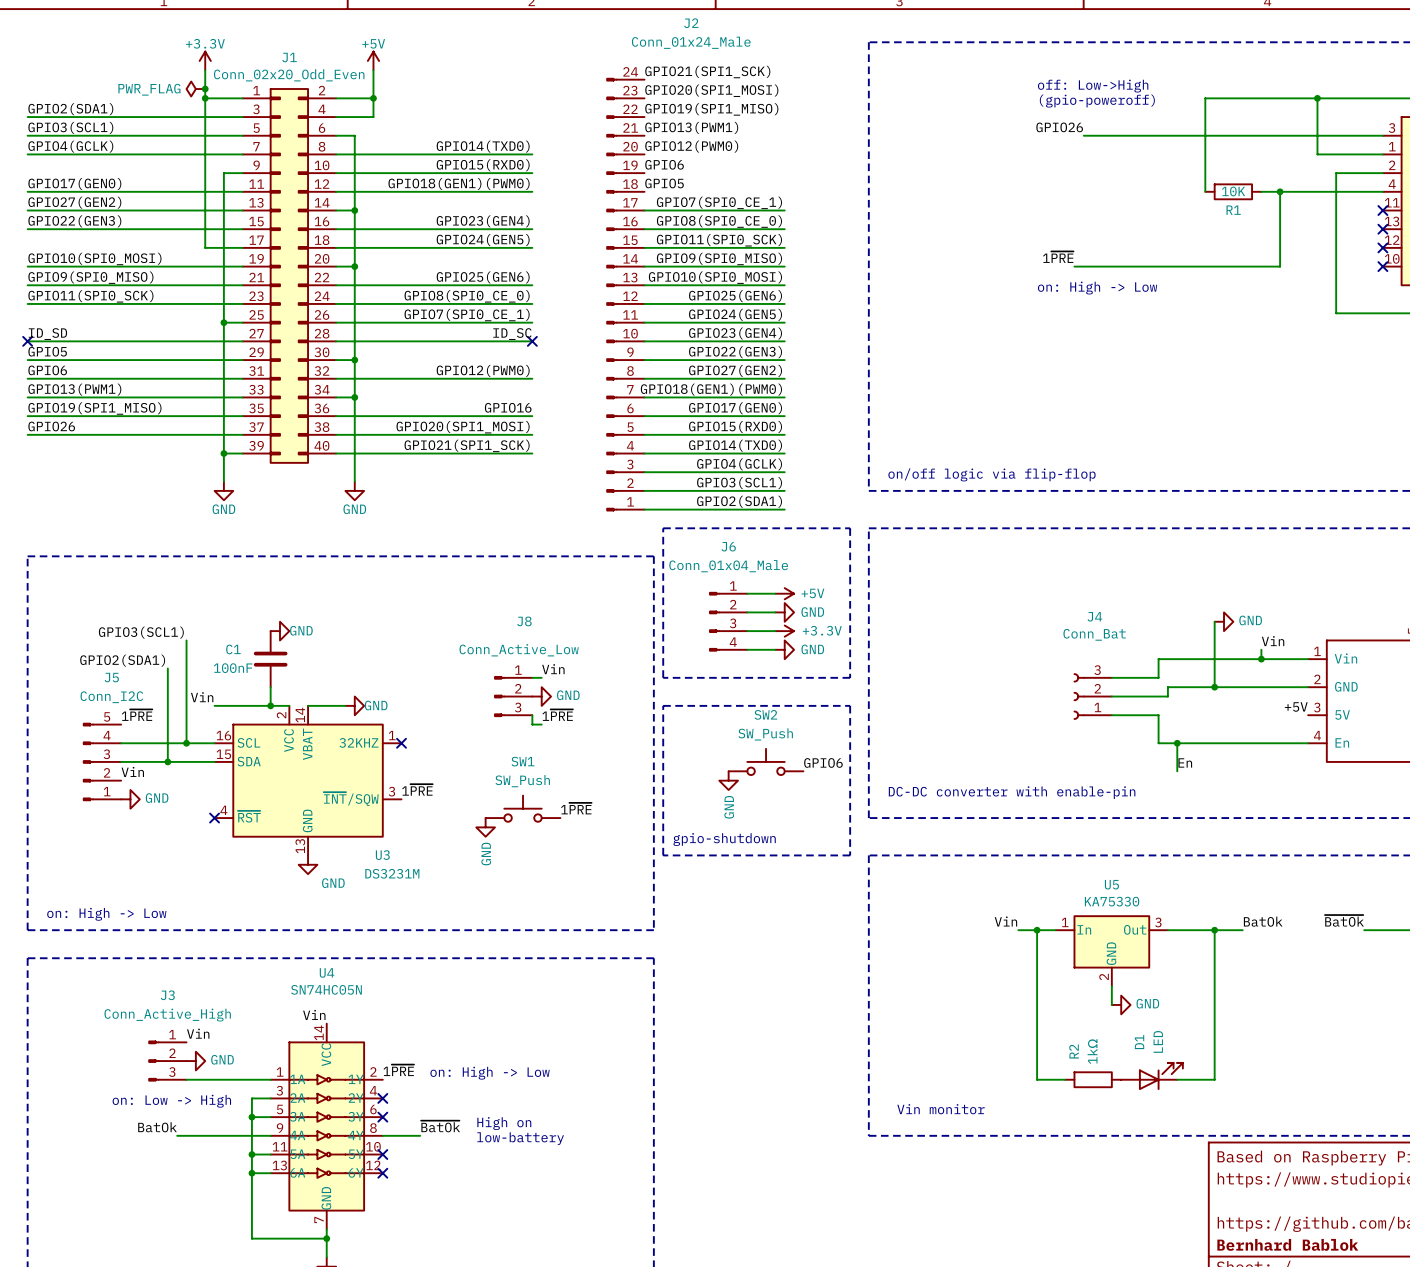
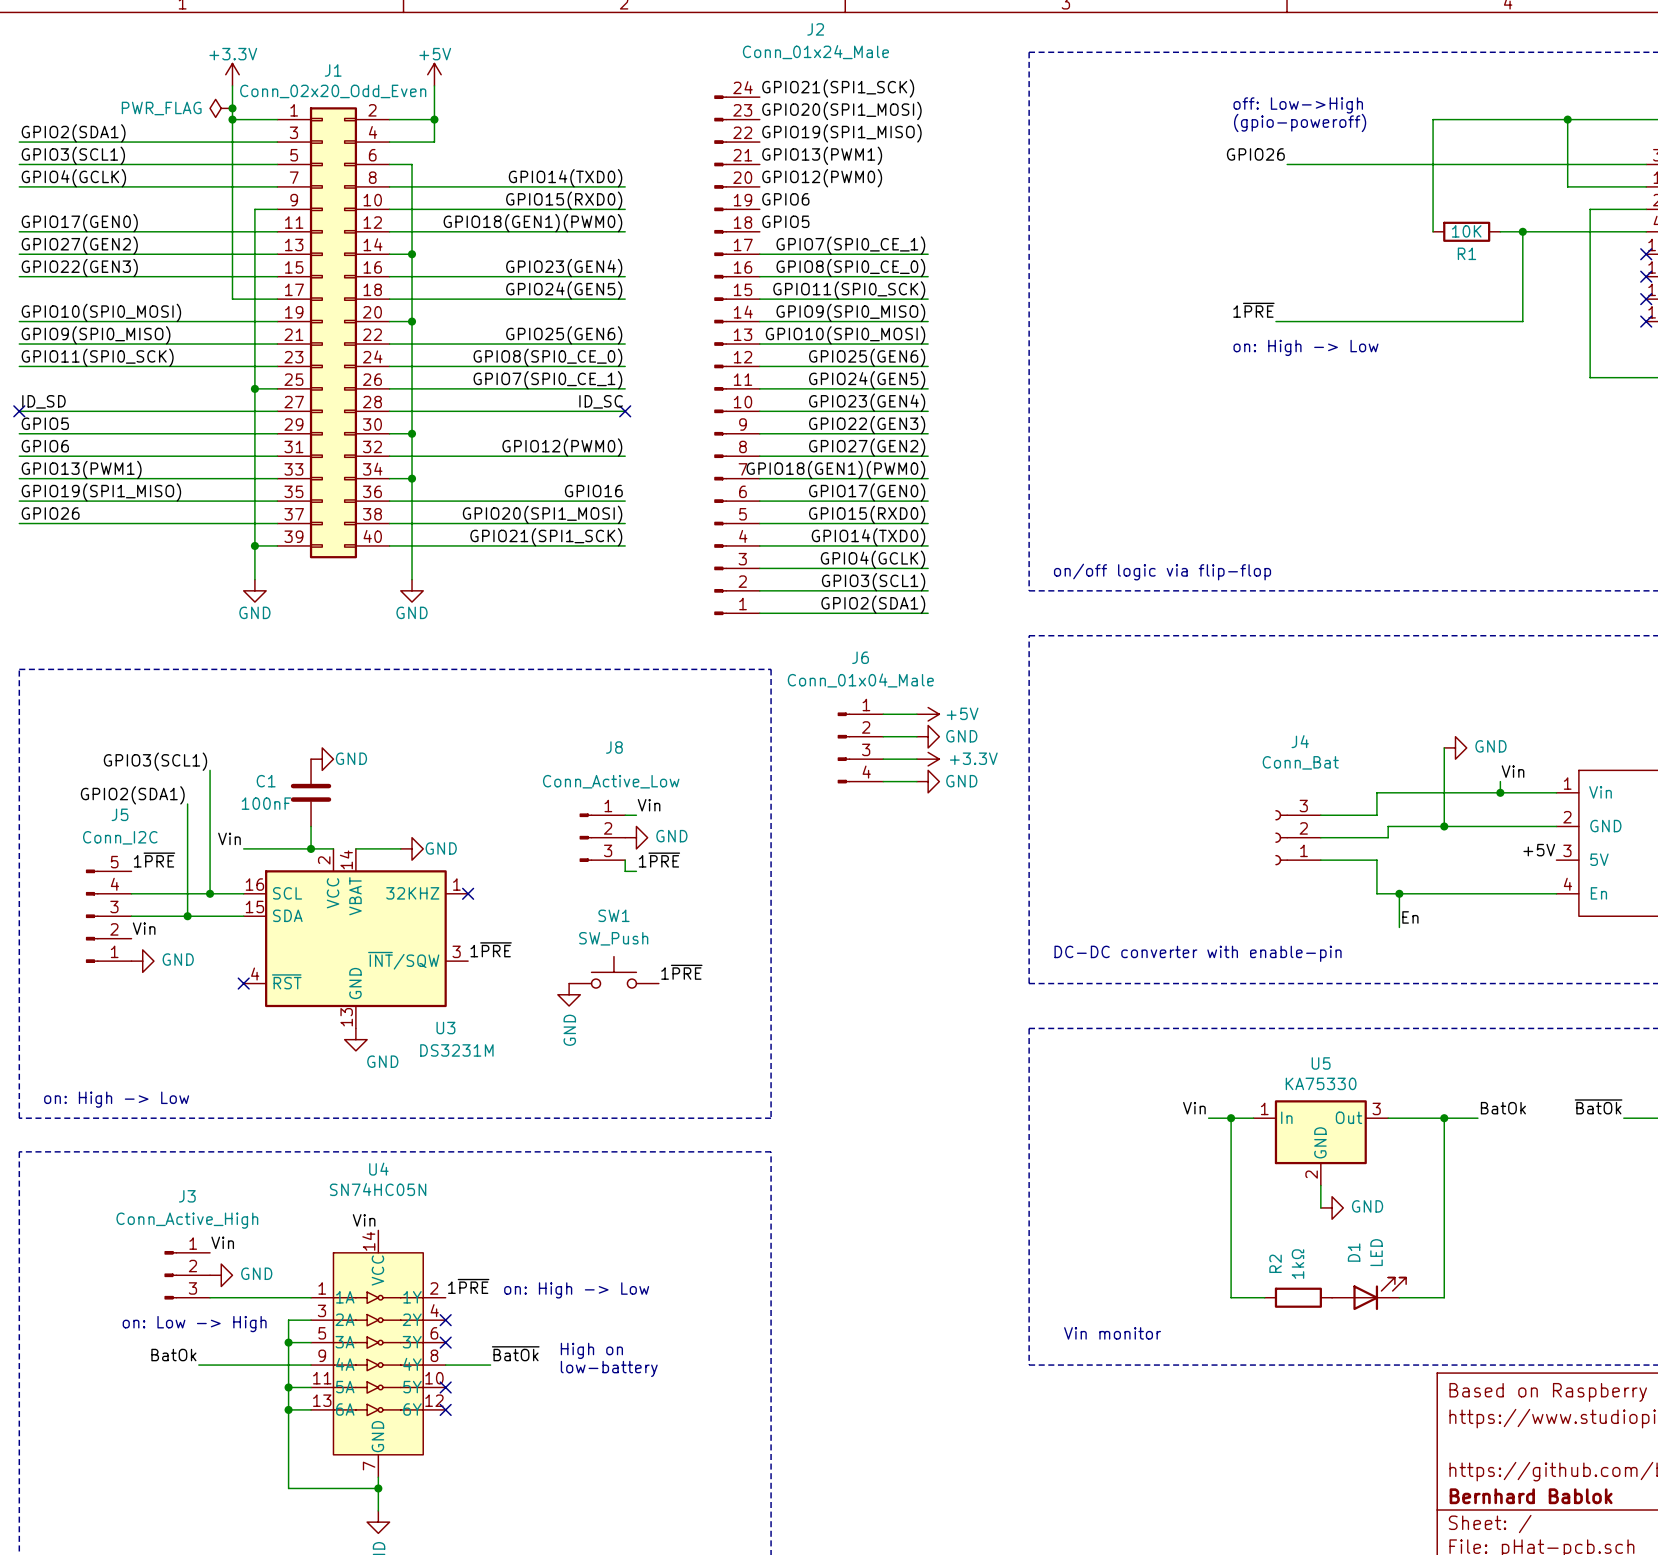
line: (663, 528) (850, 528) (850, 677) (663, 677) (663, 528) -> none
line: (663, 705) (663, 855) (850, 855) (850, 705) (663, 705) -> none
SW2: SW_Push (766, 761) -> none
label: GPIO6 (823, 762) -> none
power symbol: GND (728, 780) -> none
text: gpio-shutdown (724, 839) -> none

